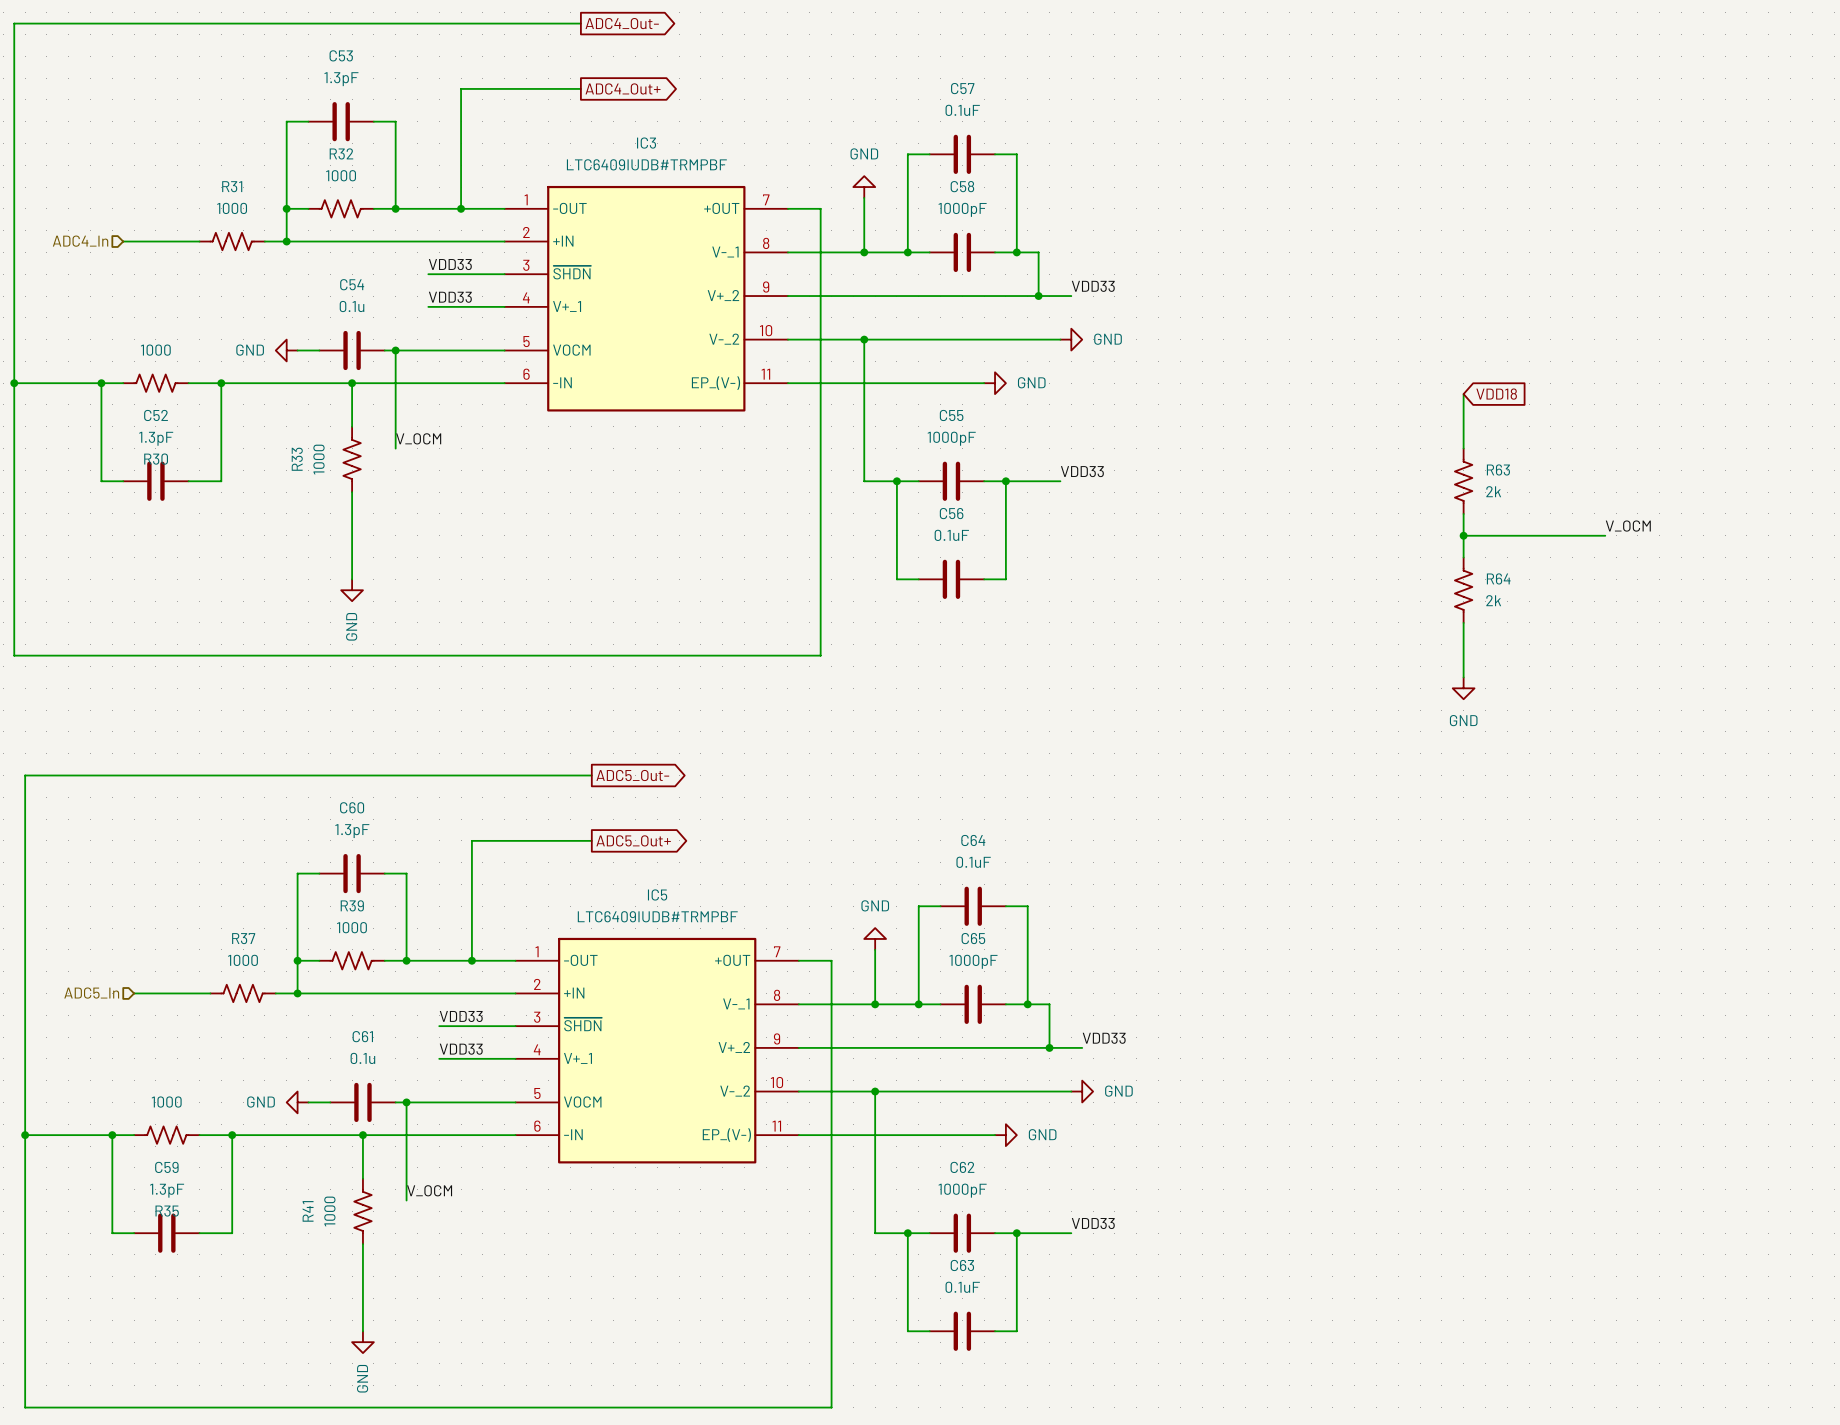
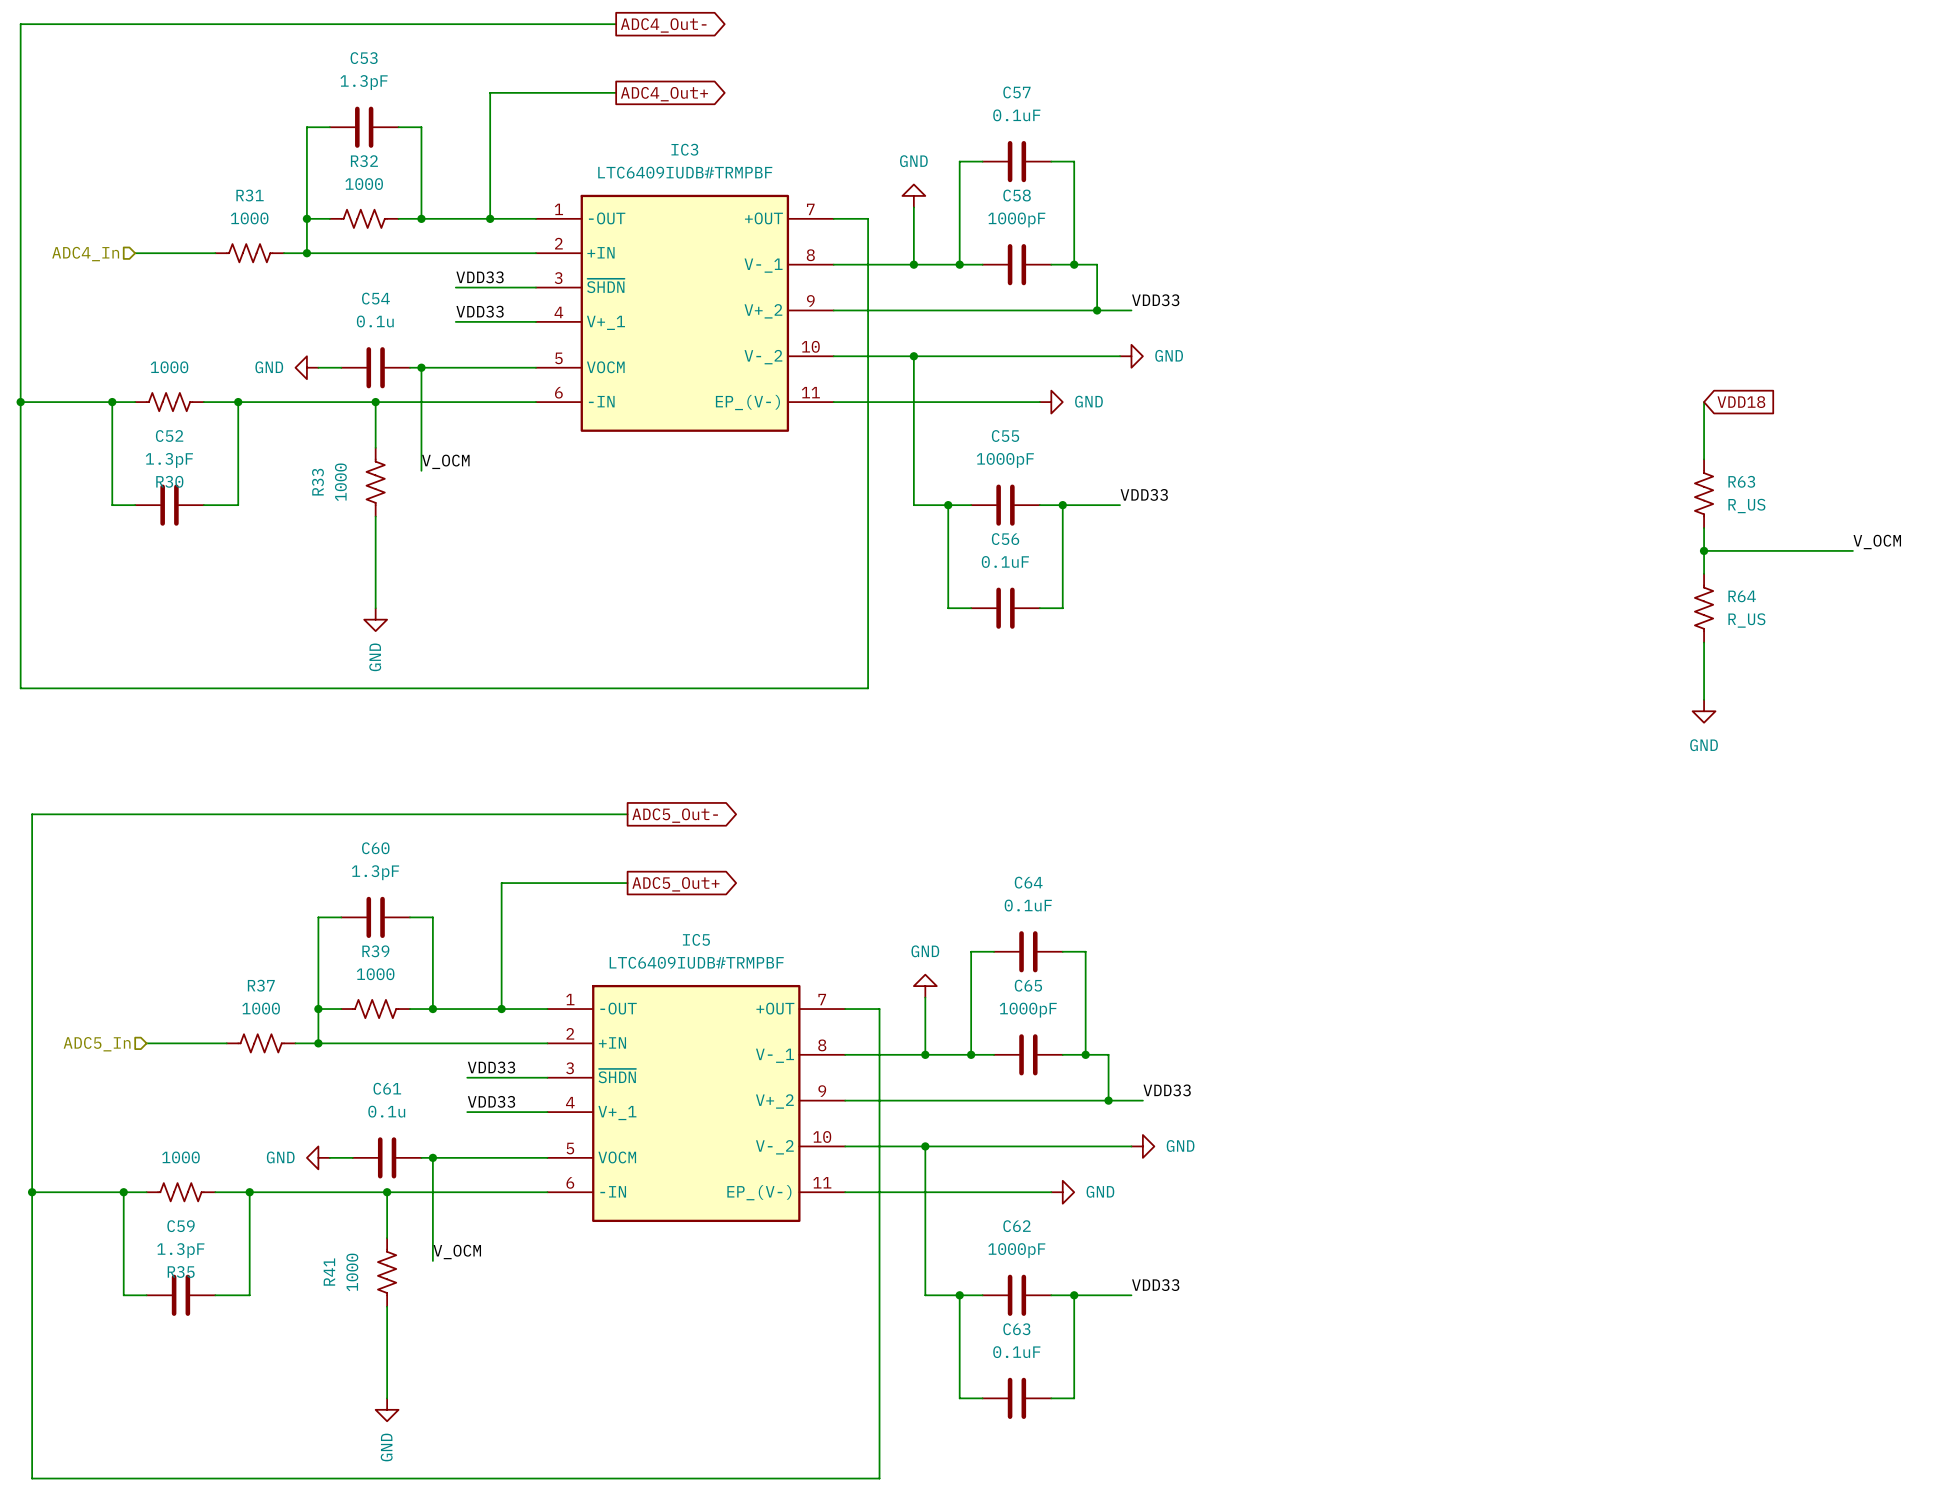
wire: (1463, 394) (1463, 448) -> (1704, 402) (1704, 459)
global label position: VDD18 (1496, 394) -> VDD18 (1741, 402)
R63 position: (1463, 481) -> (1704, 493)
R63 value: 2k (1493, 491) -> R_US (1746, 506)
wire: (1463, 513) (1463, 557) -> (1704, 528) (1704, 573)
junction: none -> (1704, 550)
label position: V_OCM (1628, 526) -> V_OCM (1877, 542)
wire: (1463, 535) (1605, 535) -> (1704, 550) (1852, 550)
junction: (1463, 535) -> none
R64 position: (1463, 590) -> (1704, 608)
R64 value: 2k (1493, 600) -> R_US (1746, 620)
wire: (1463, 622) (1463, 677) -> (1704, 642) (1704, 699)
power symbol position: GND (1463, 688) -> GND (1704, 711)

